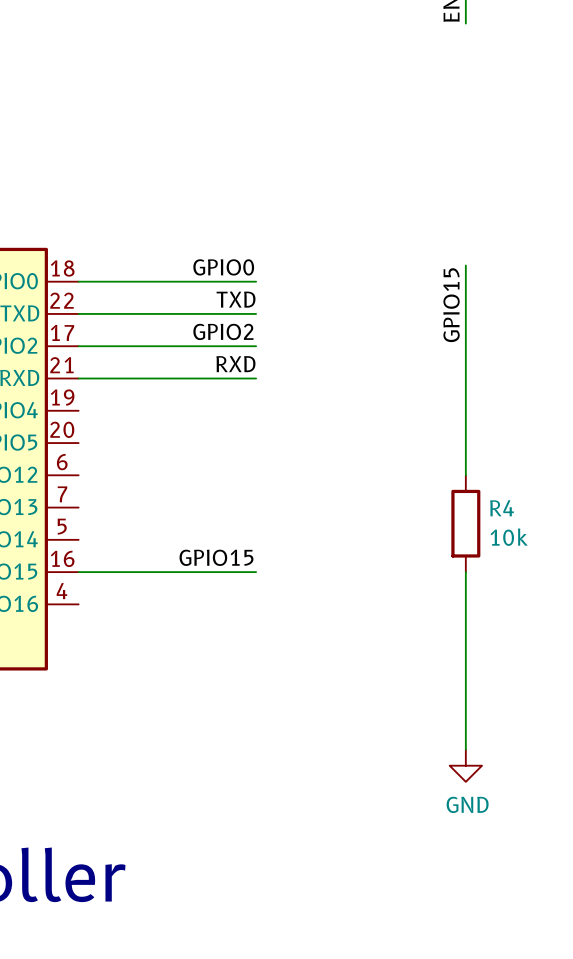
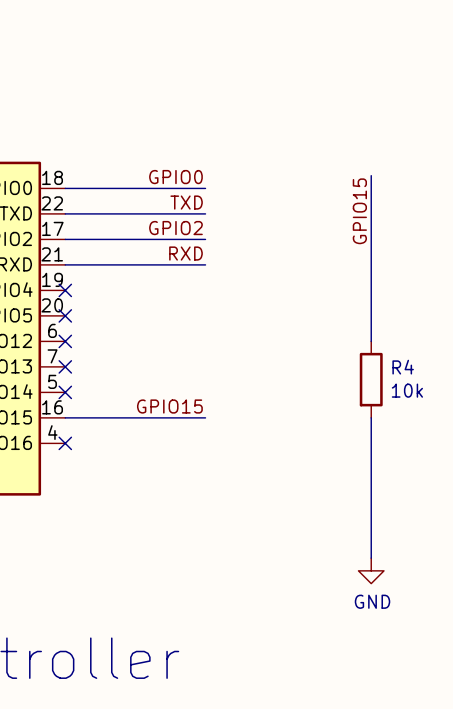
no-connect mark: none -> (65, 290)
no-connect mark: none -> (65, 315)
no-connect mark: none -> (65, 341)
no-connect mark: none -> (65, 366)
no-connect mark: none -> (65, 392)
no-connect mark: none -> (65, 443)

